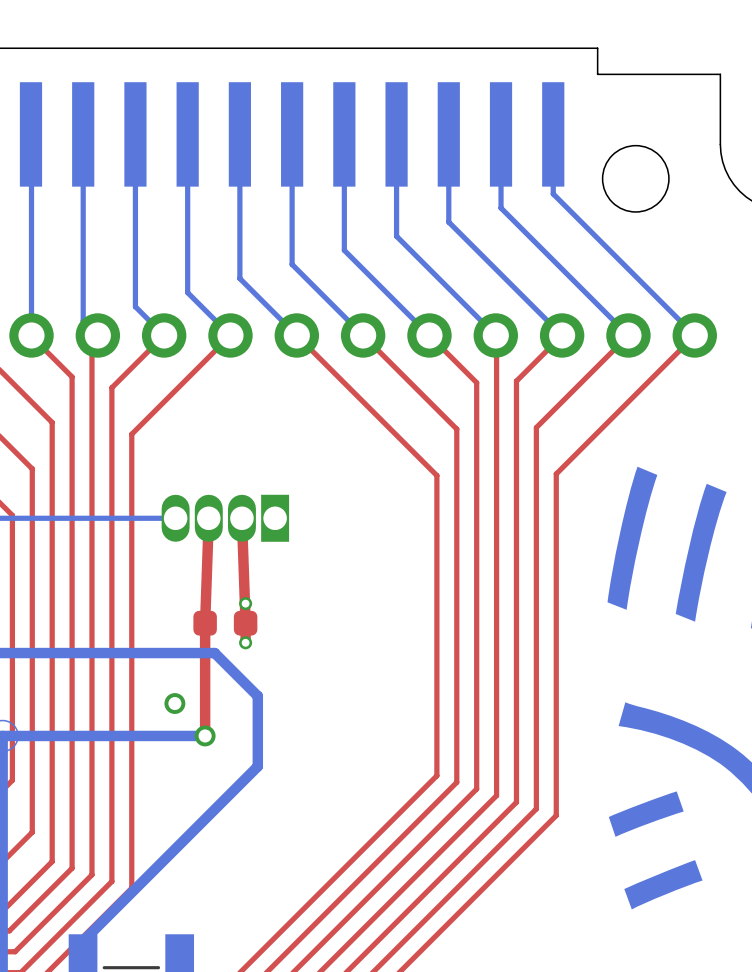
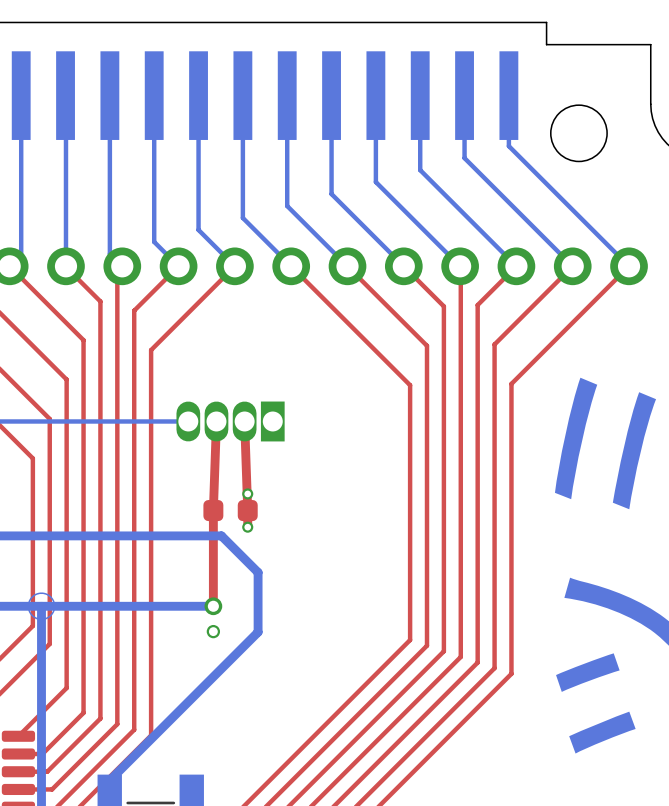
via: (174, 703) -> none
via: none -> (213, 631)

